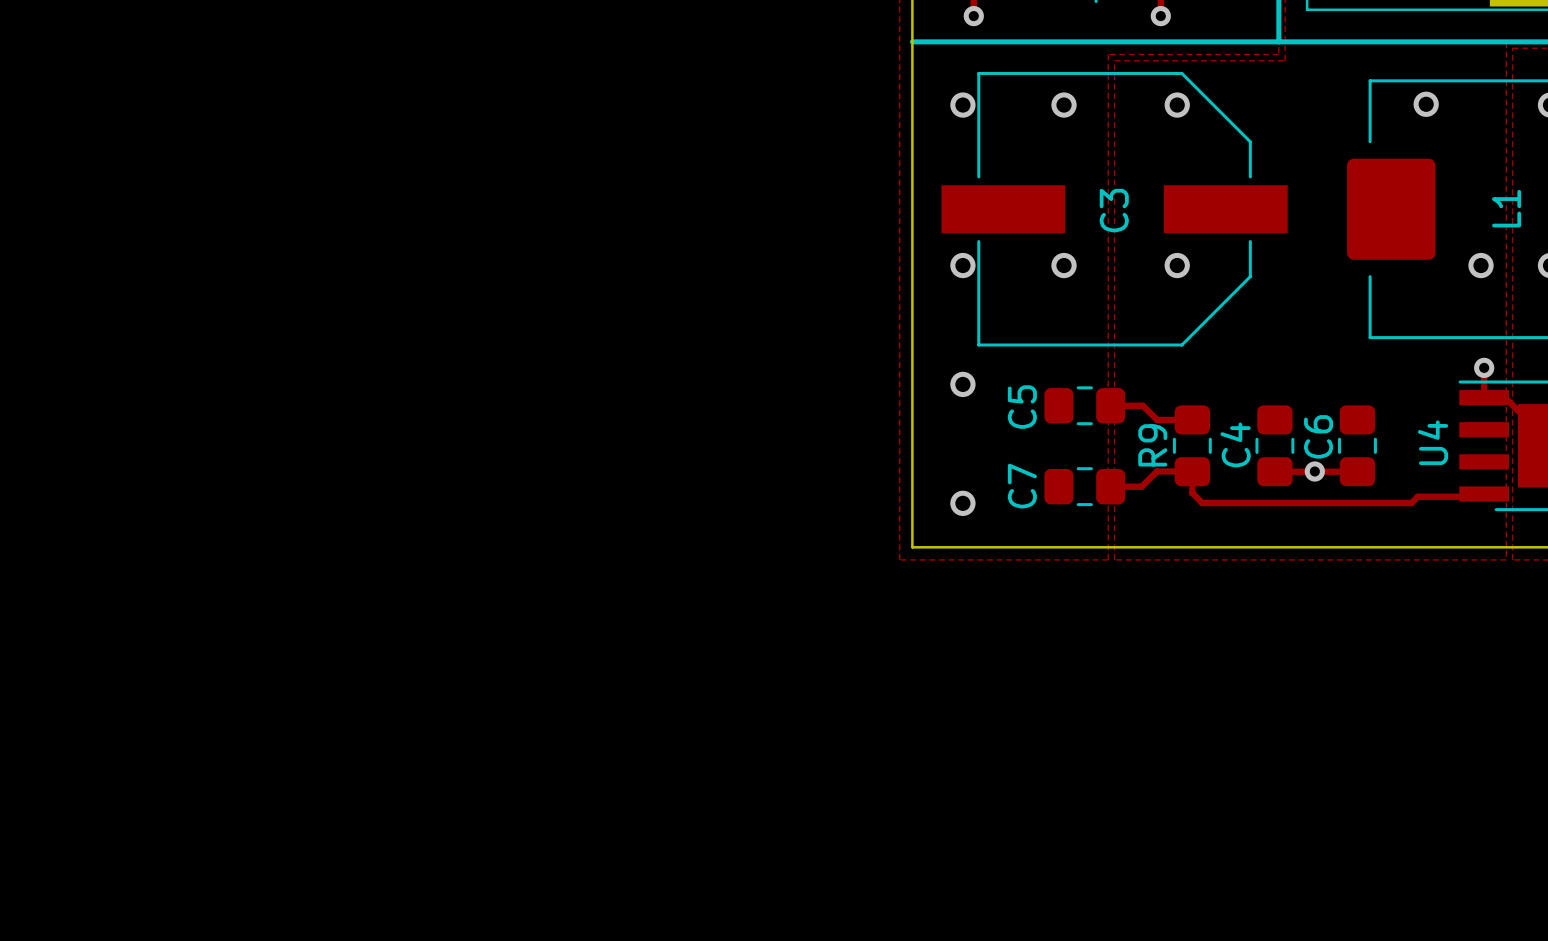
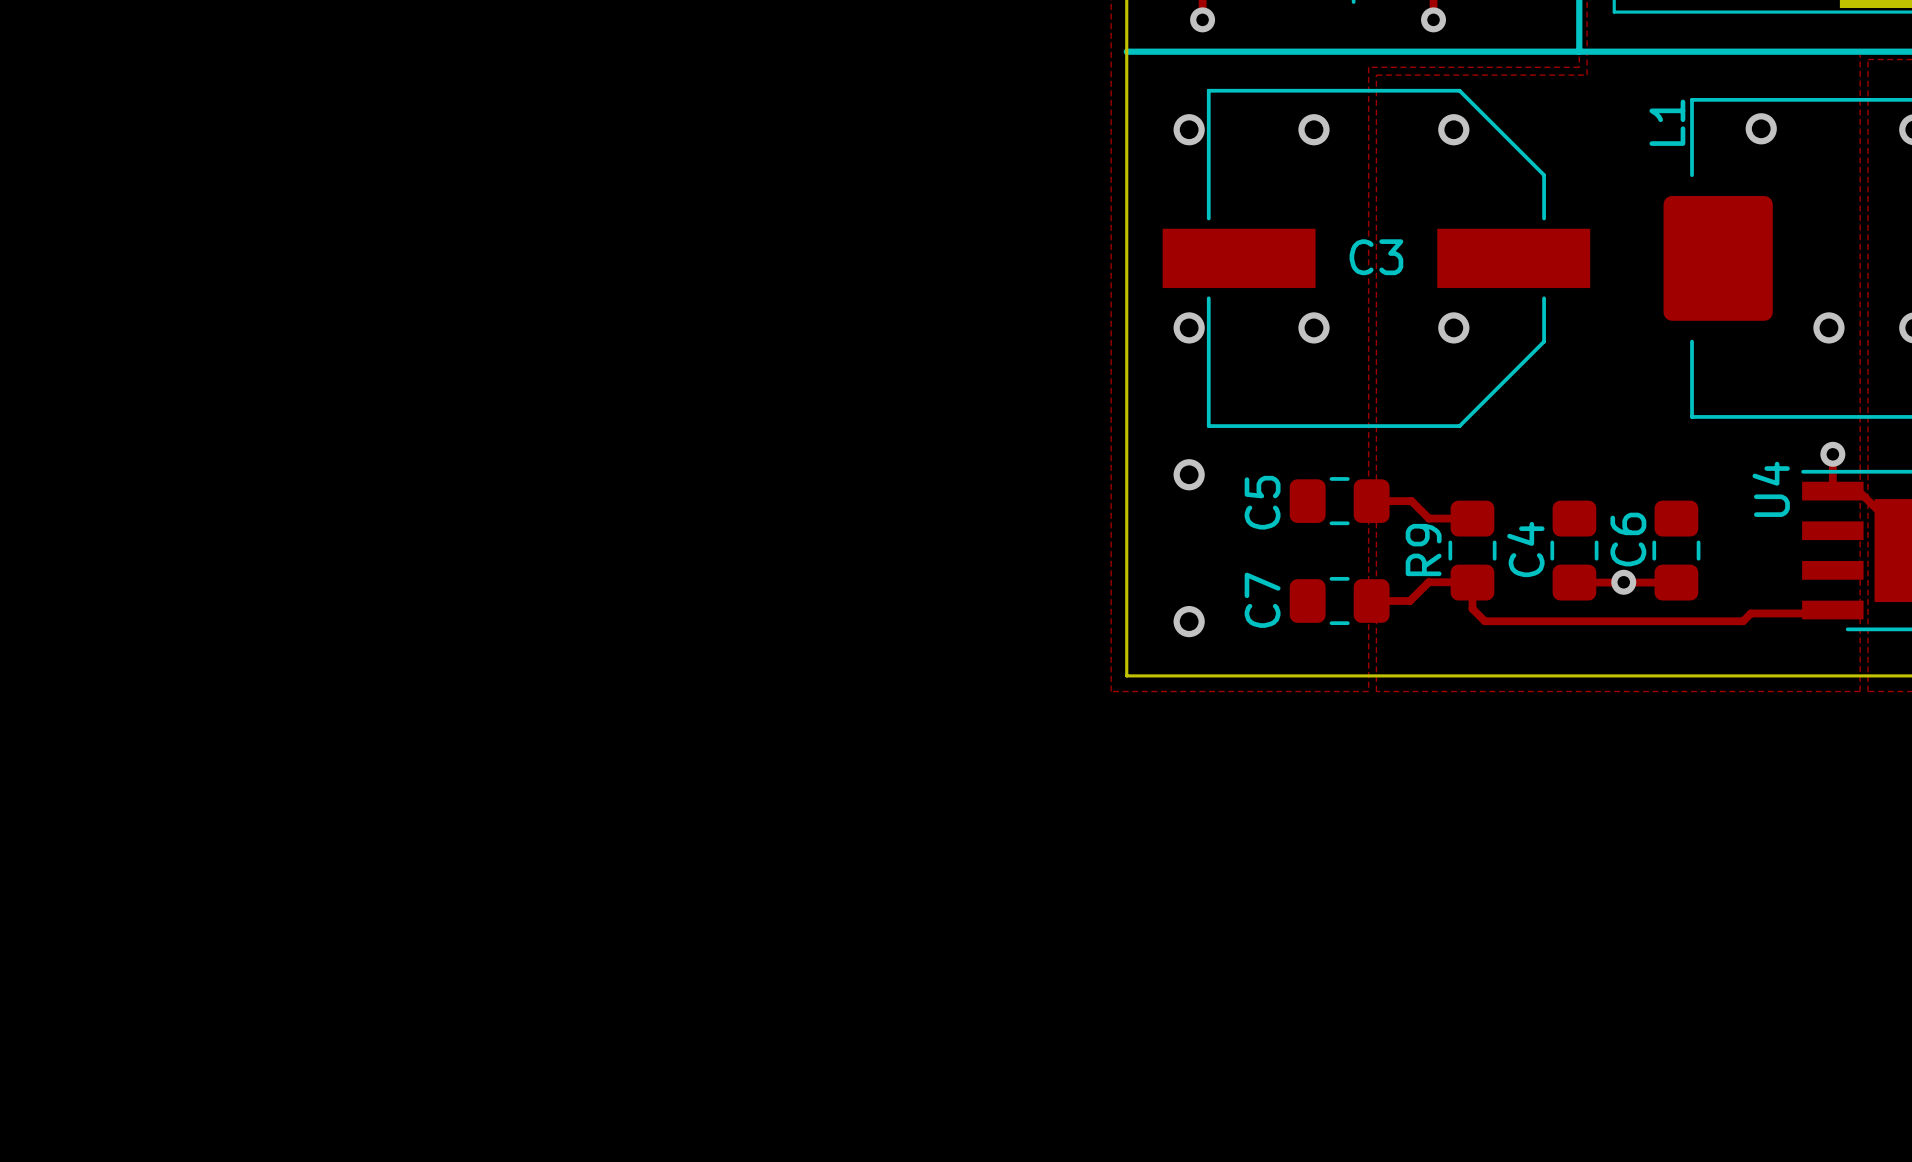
L1 name position: L1 (1506, 208) -> L1 (1667, 122)
C3 name rotation: 0° (1114, 210) -> 90° clockwise (1376, 257)
U4 name position: U4 (1432, 442) -> U4 (1771, 489)

